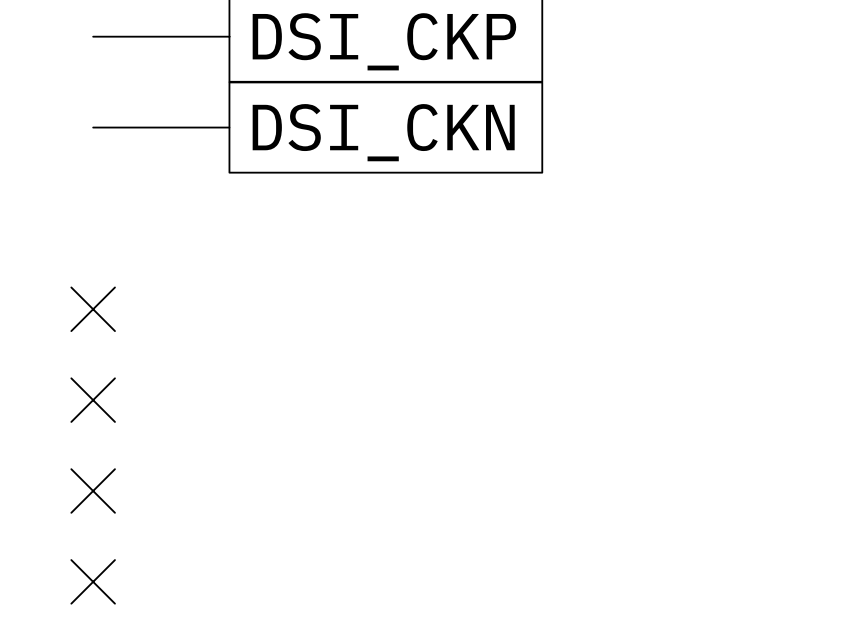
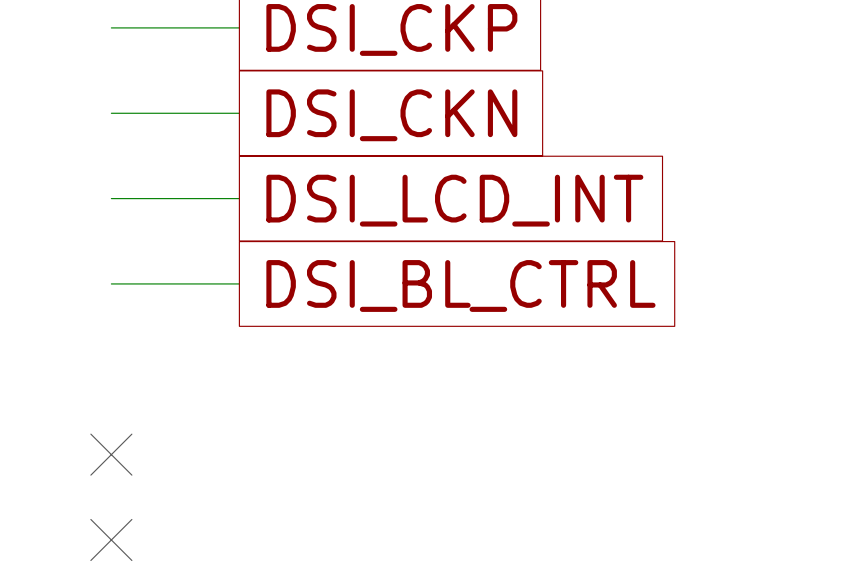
wire: none -> (111, 198) (239, 198)
global label: none -> DSI_LCD_INT (454, 200)
wire: none -> (111, 283) (239, 283)
no-connect mark: (93, 309) -> none
global label: none -> DSI_BL_CTRL (460, 285)
no-connect mark: (93, 400) -> none

